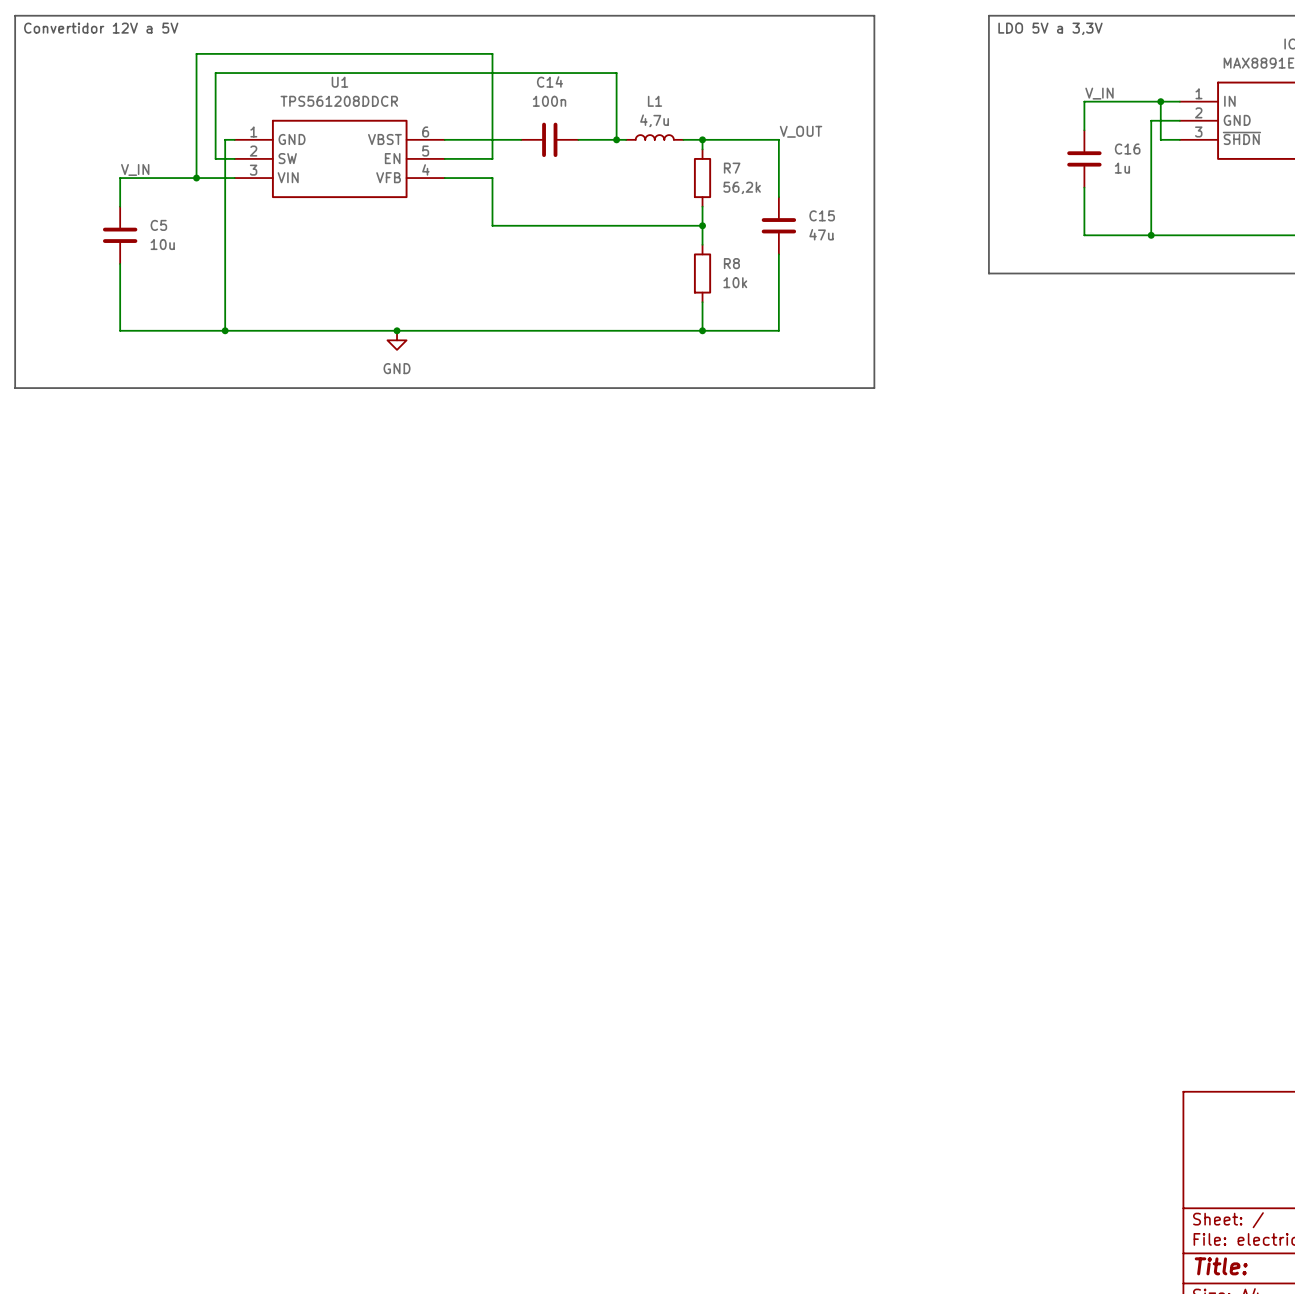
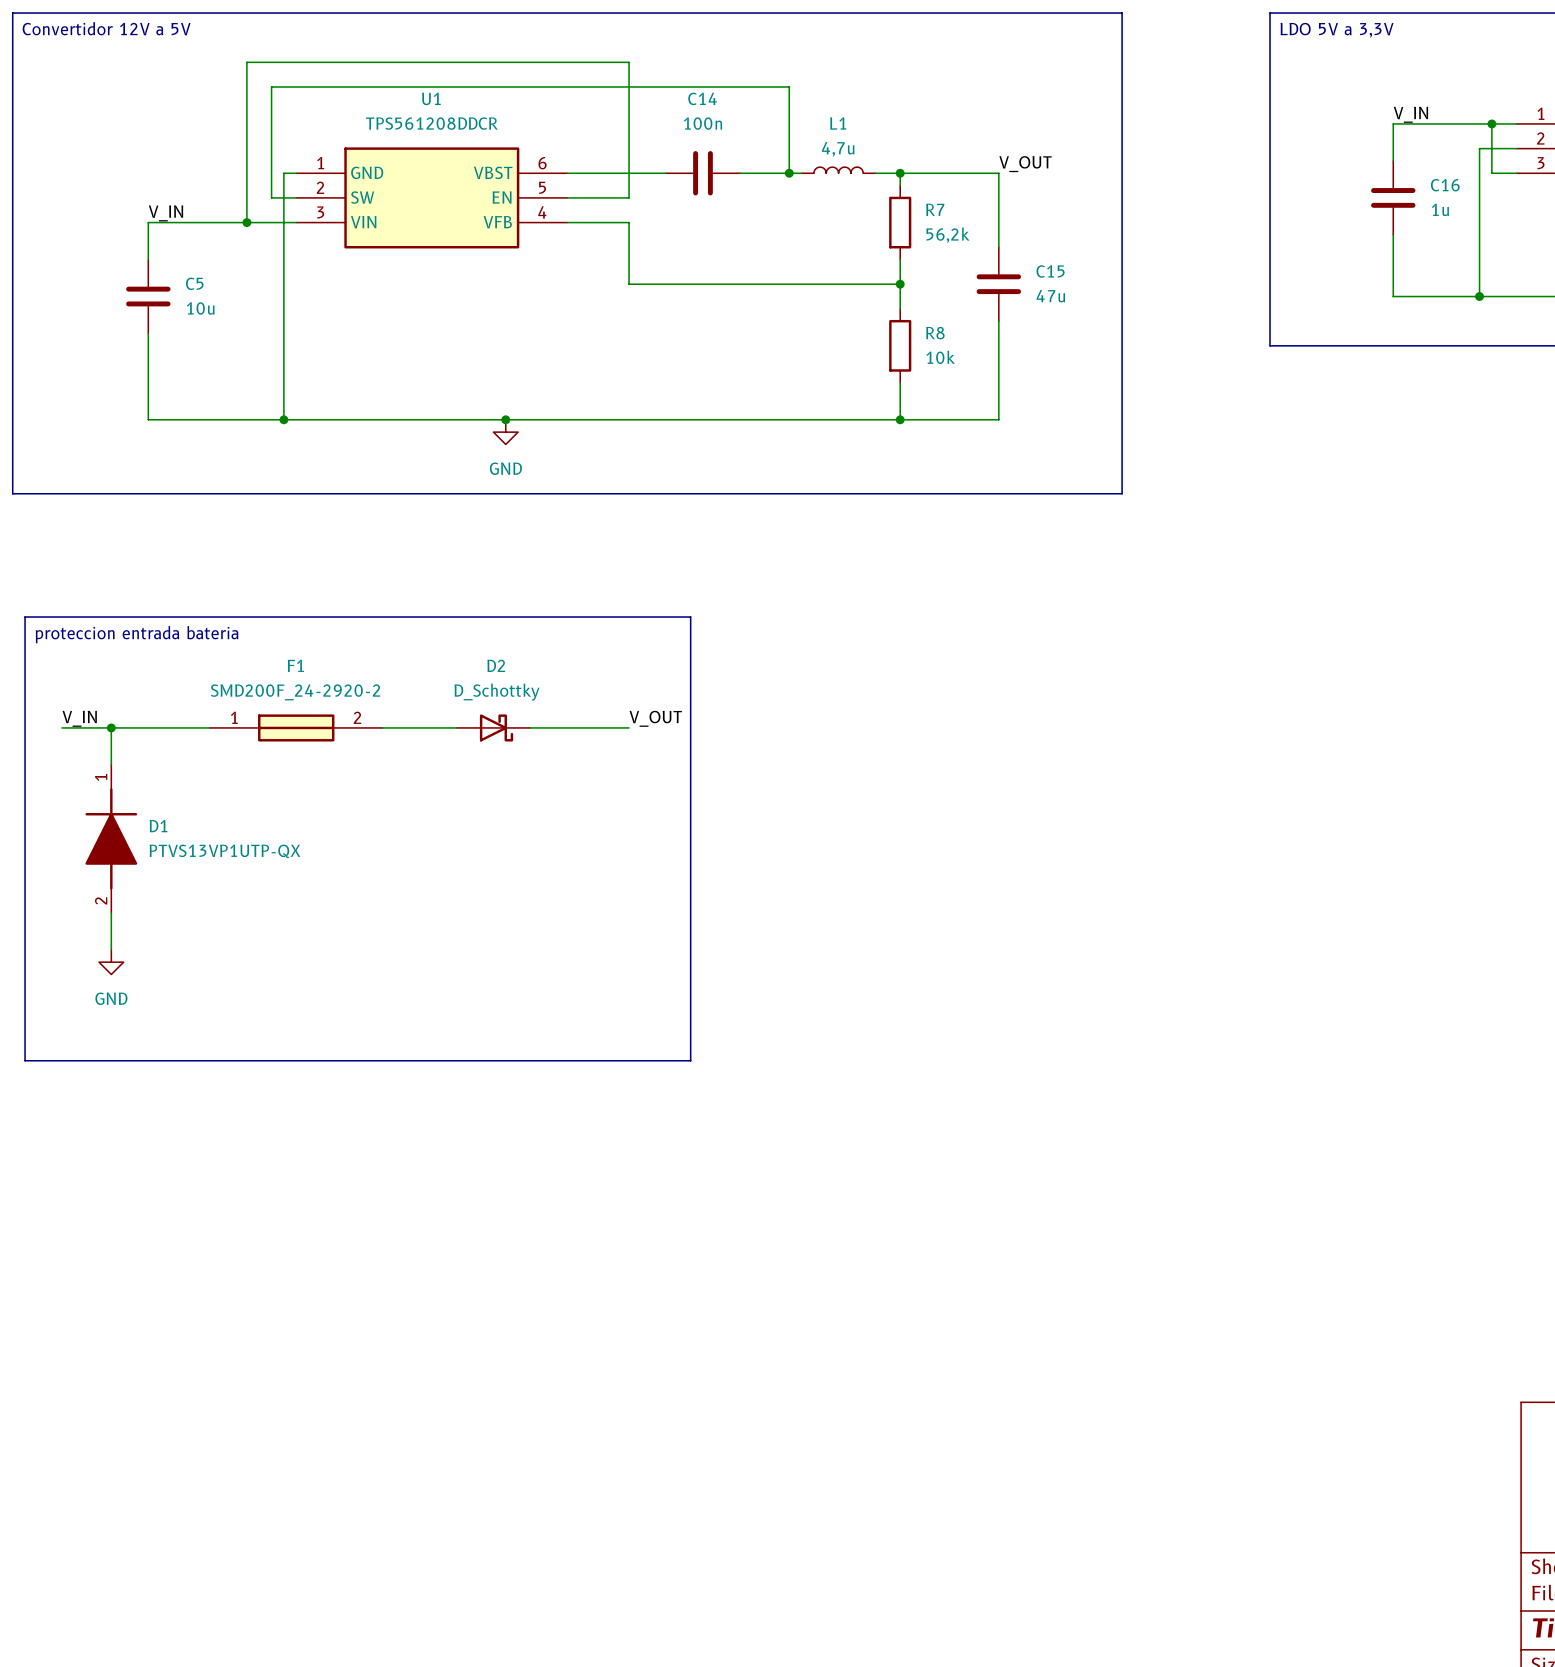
line: none -> (25, 617) (690, 617) (690, 1060) (25, 1060) (25, 617)
text: none -> proteccion entrada bateria (137, 634)
label: none -> V_IN (79, 718)
label: none -> V_OUT (655, 718)
wire: none -> (62, 727) (209, 727)
wire: none -> (111, 727) (111, 764)
junction: none -> (111, 727)
F1: none -> SMD200F_24-2920-2 (296, 727)
wire: none -> (382, 727) (456, 727)
D2: none -> D_Schottky (493, 727)
wire: none -> (530, 727) (629, 727)
D1: none -> PTVS13VP1UTP-QX (111, 838)
wire: none -> (111, 912) (111, 949)
power symbol: none -> GND (111, 962)

